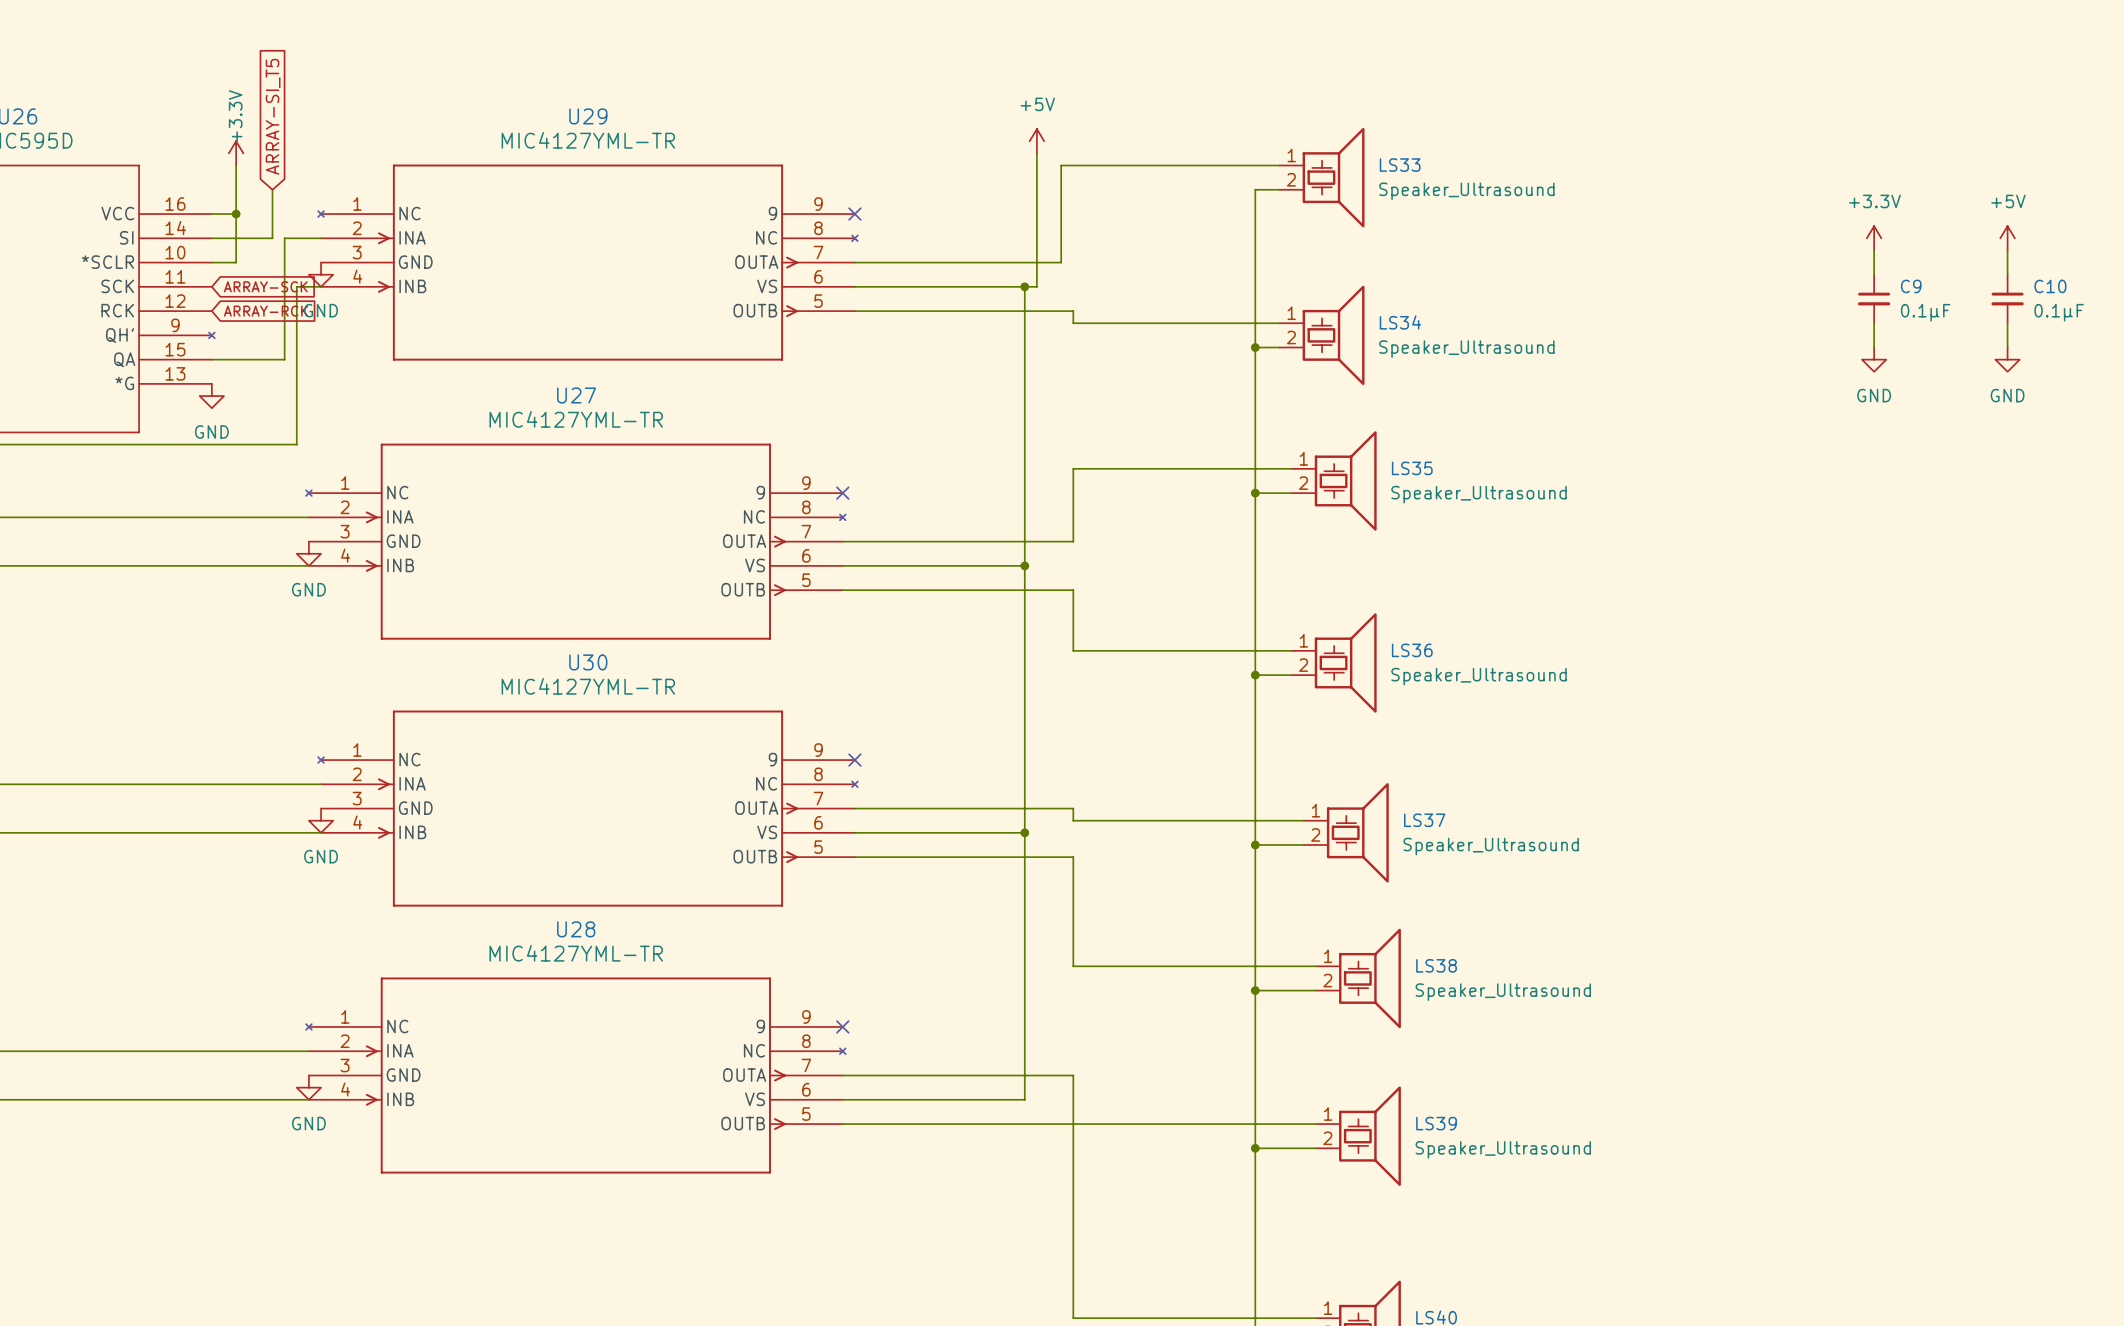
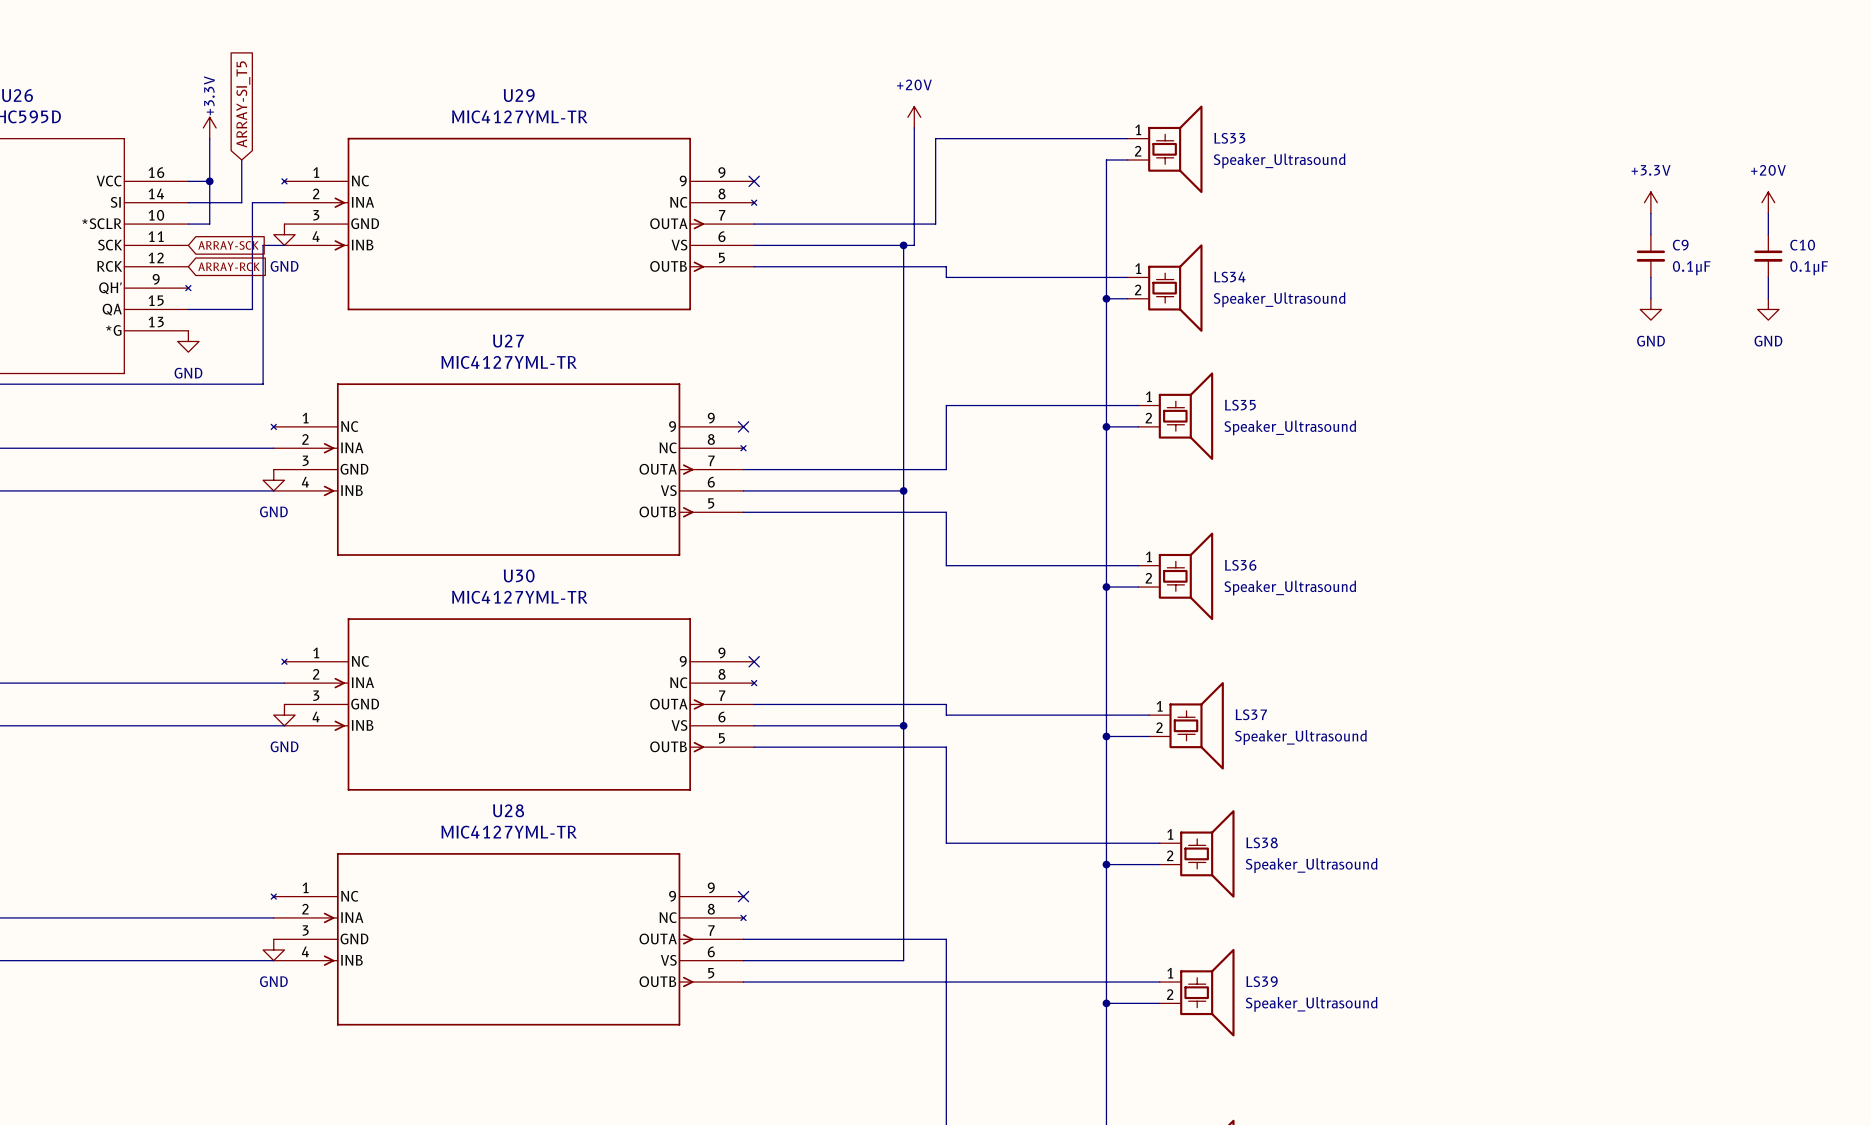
power symbol: +5V (1036, 141) -> +20V (914, 117)
power symbol: +5V (2007, 238) -> +20V (1768, 202)

